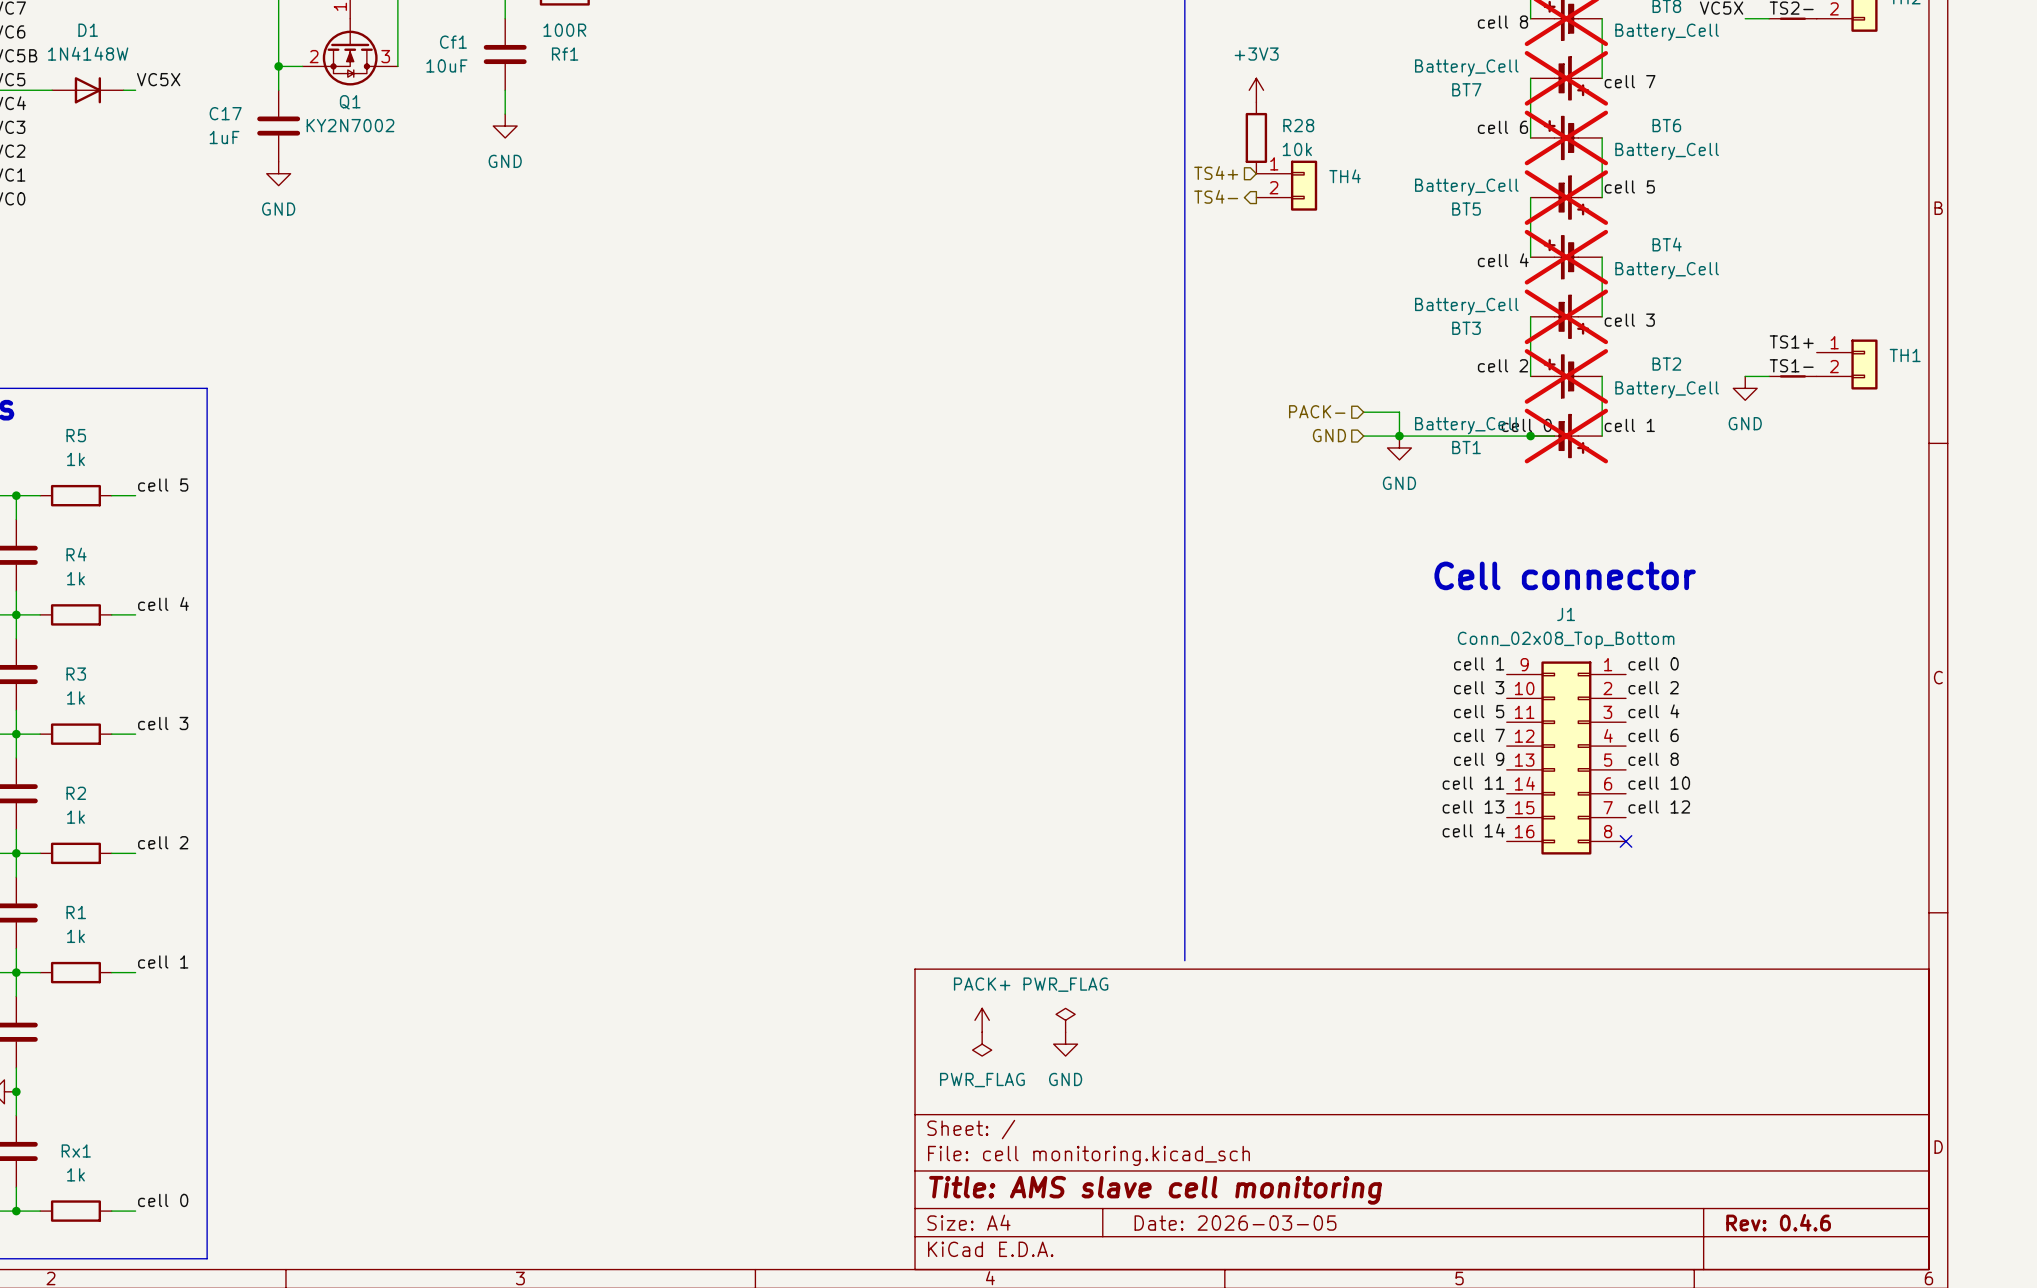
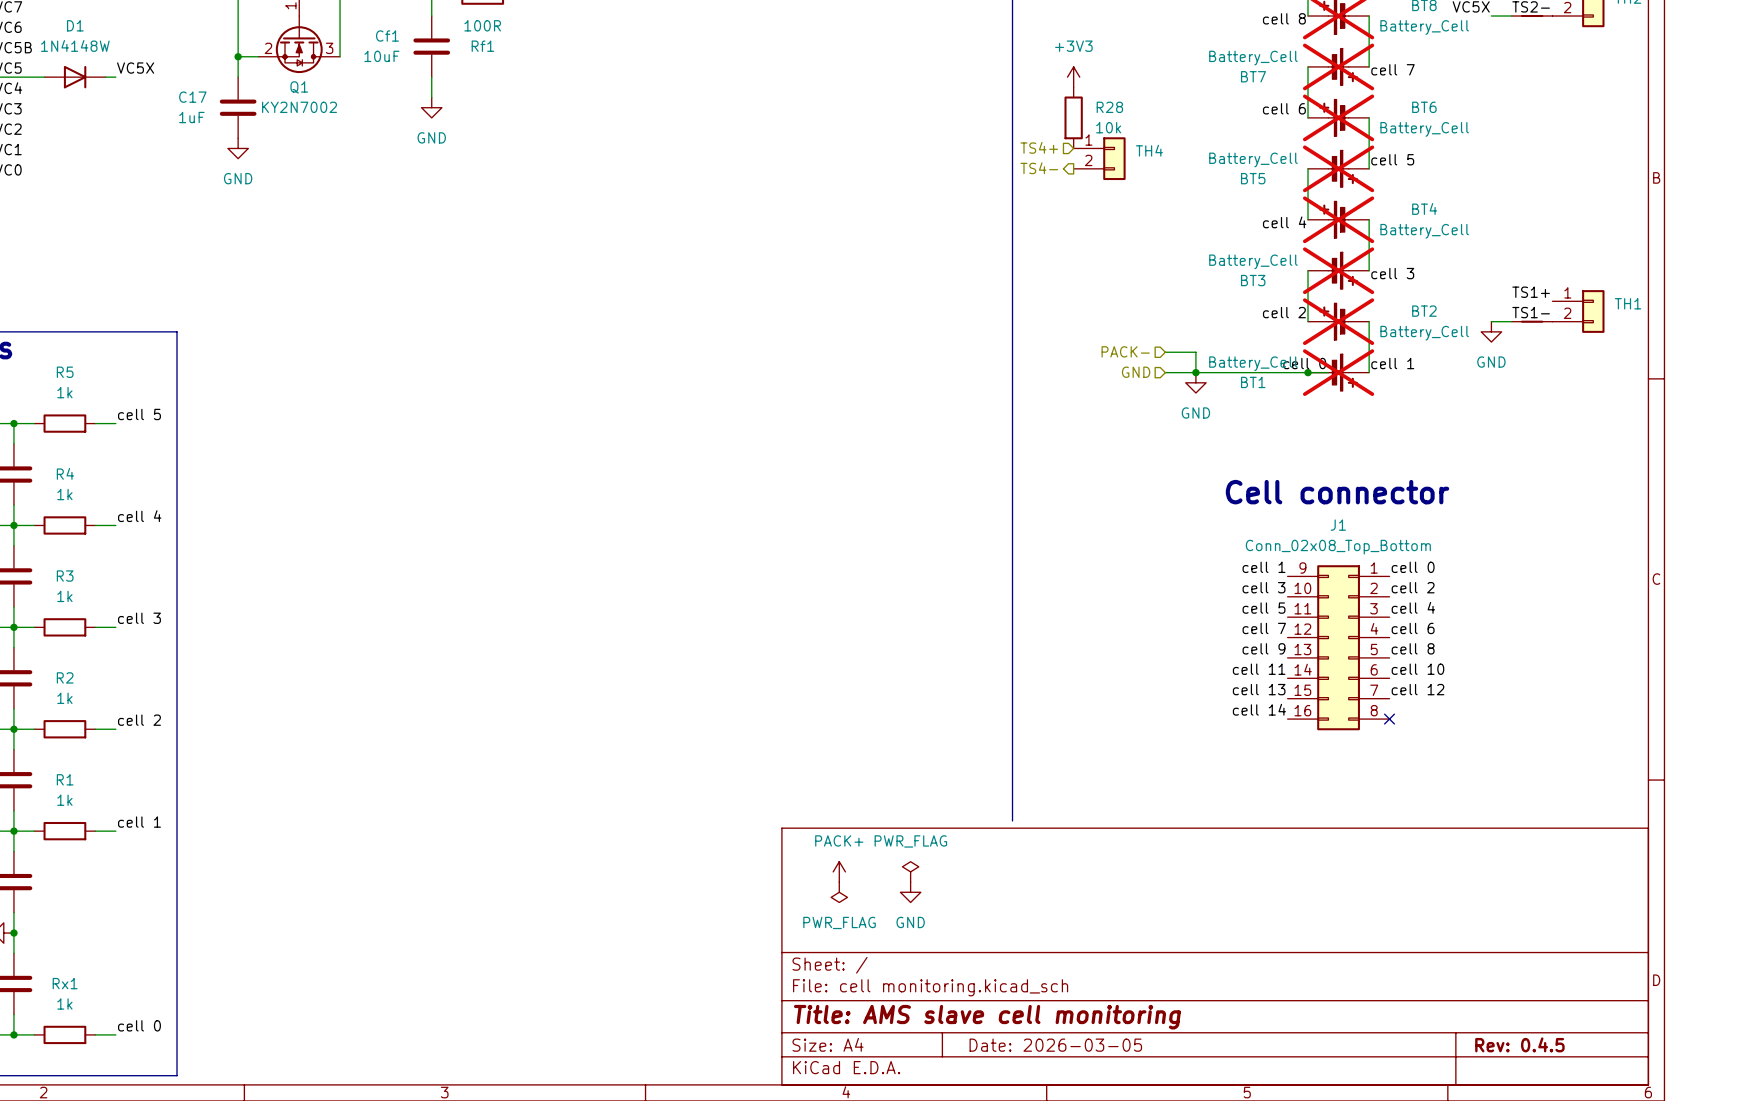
title block: Rev: 0.4.6 (1778, 1222) -> Rev: 0.4.5 (1519, 1044)

